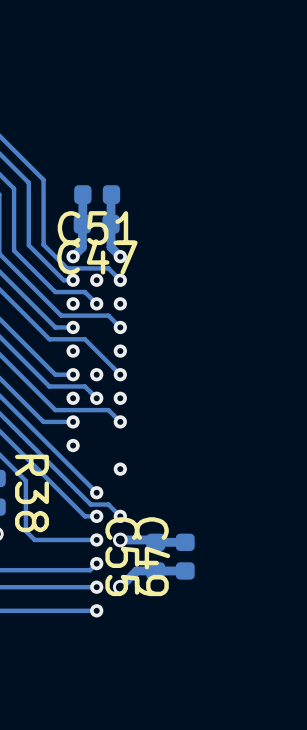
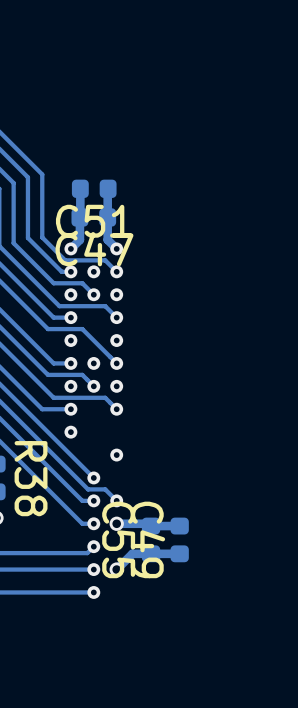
track: (25, 480) (25, 531) (34, 539) (84, 539) -> (25, 466) (82, 523)

